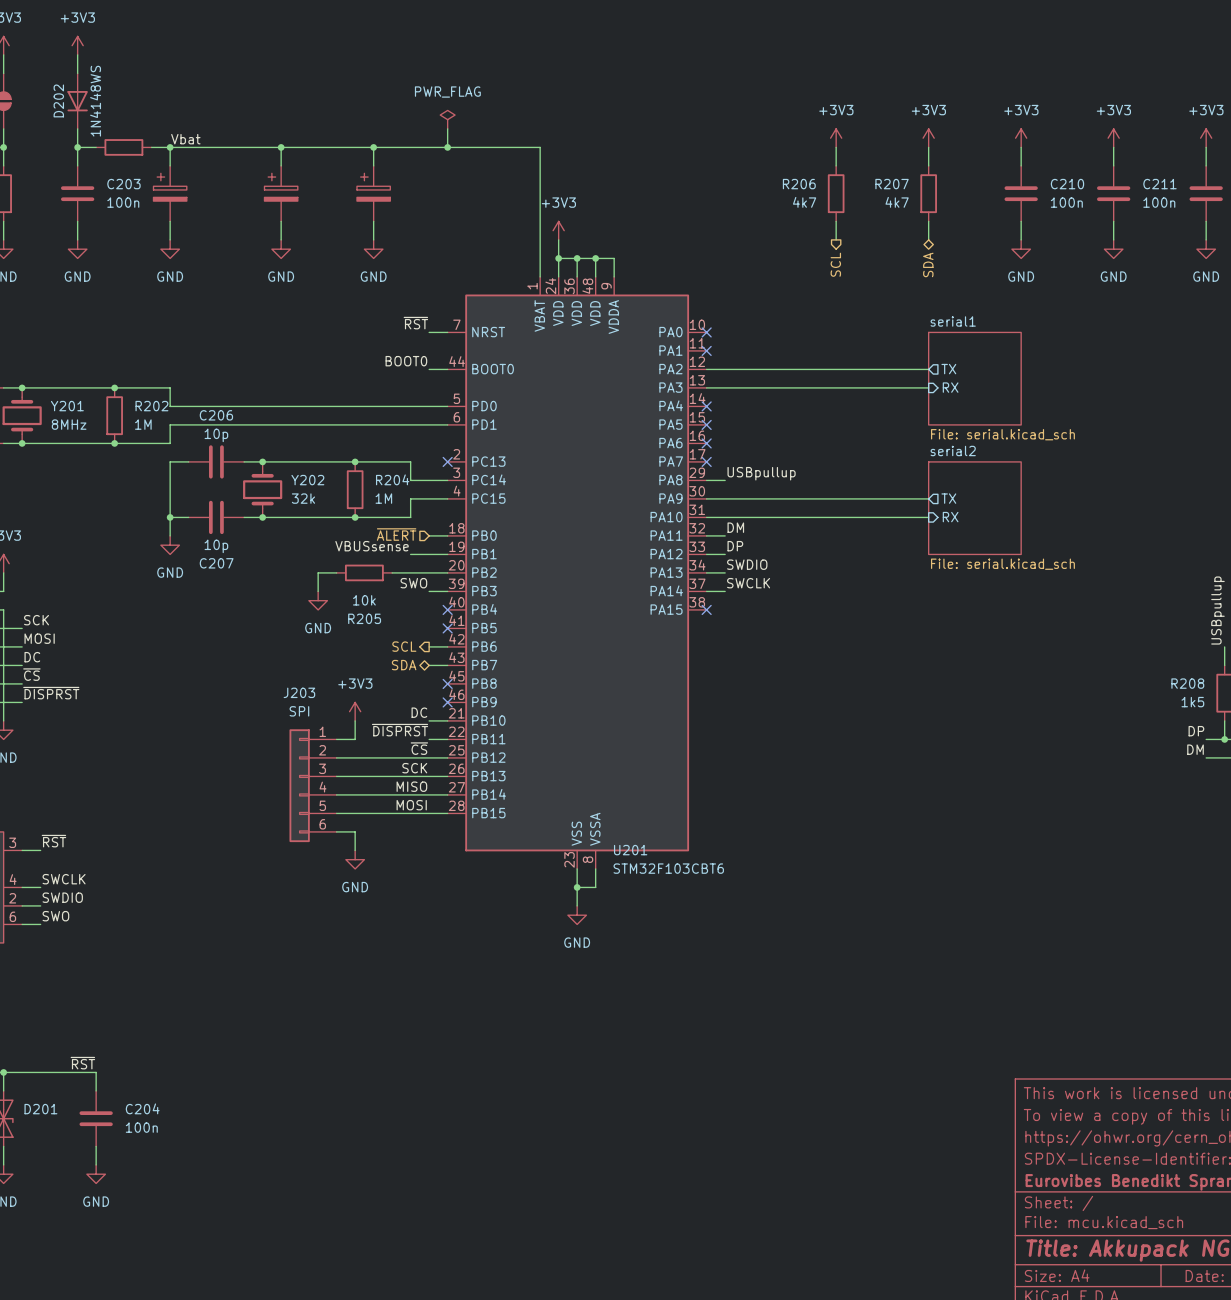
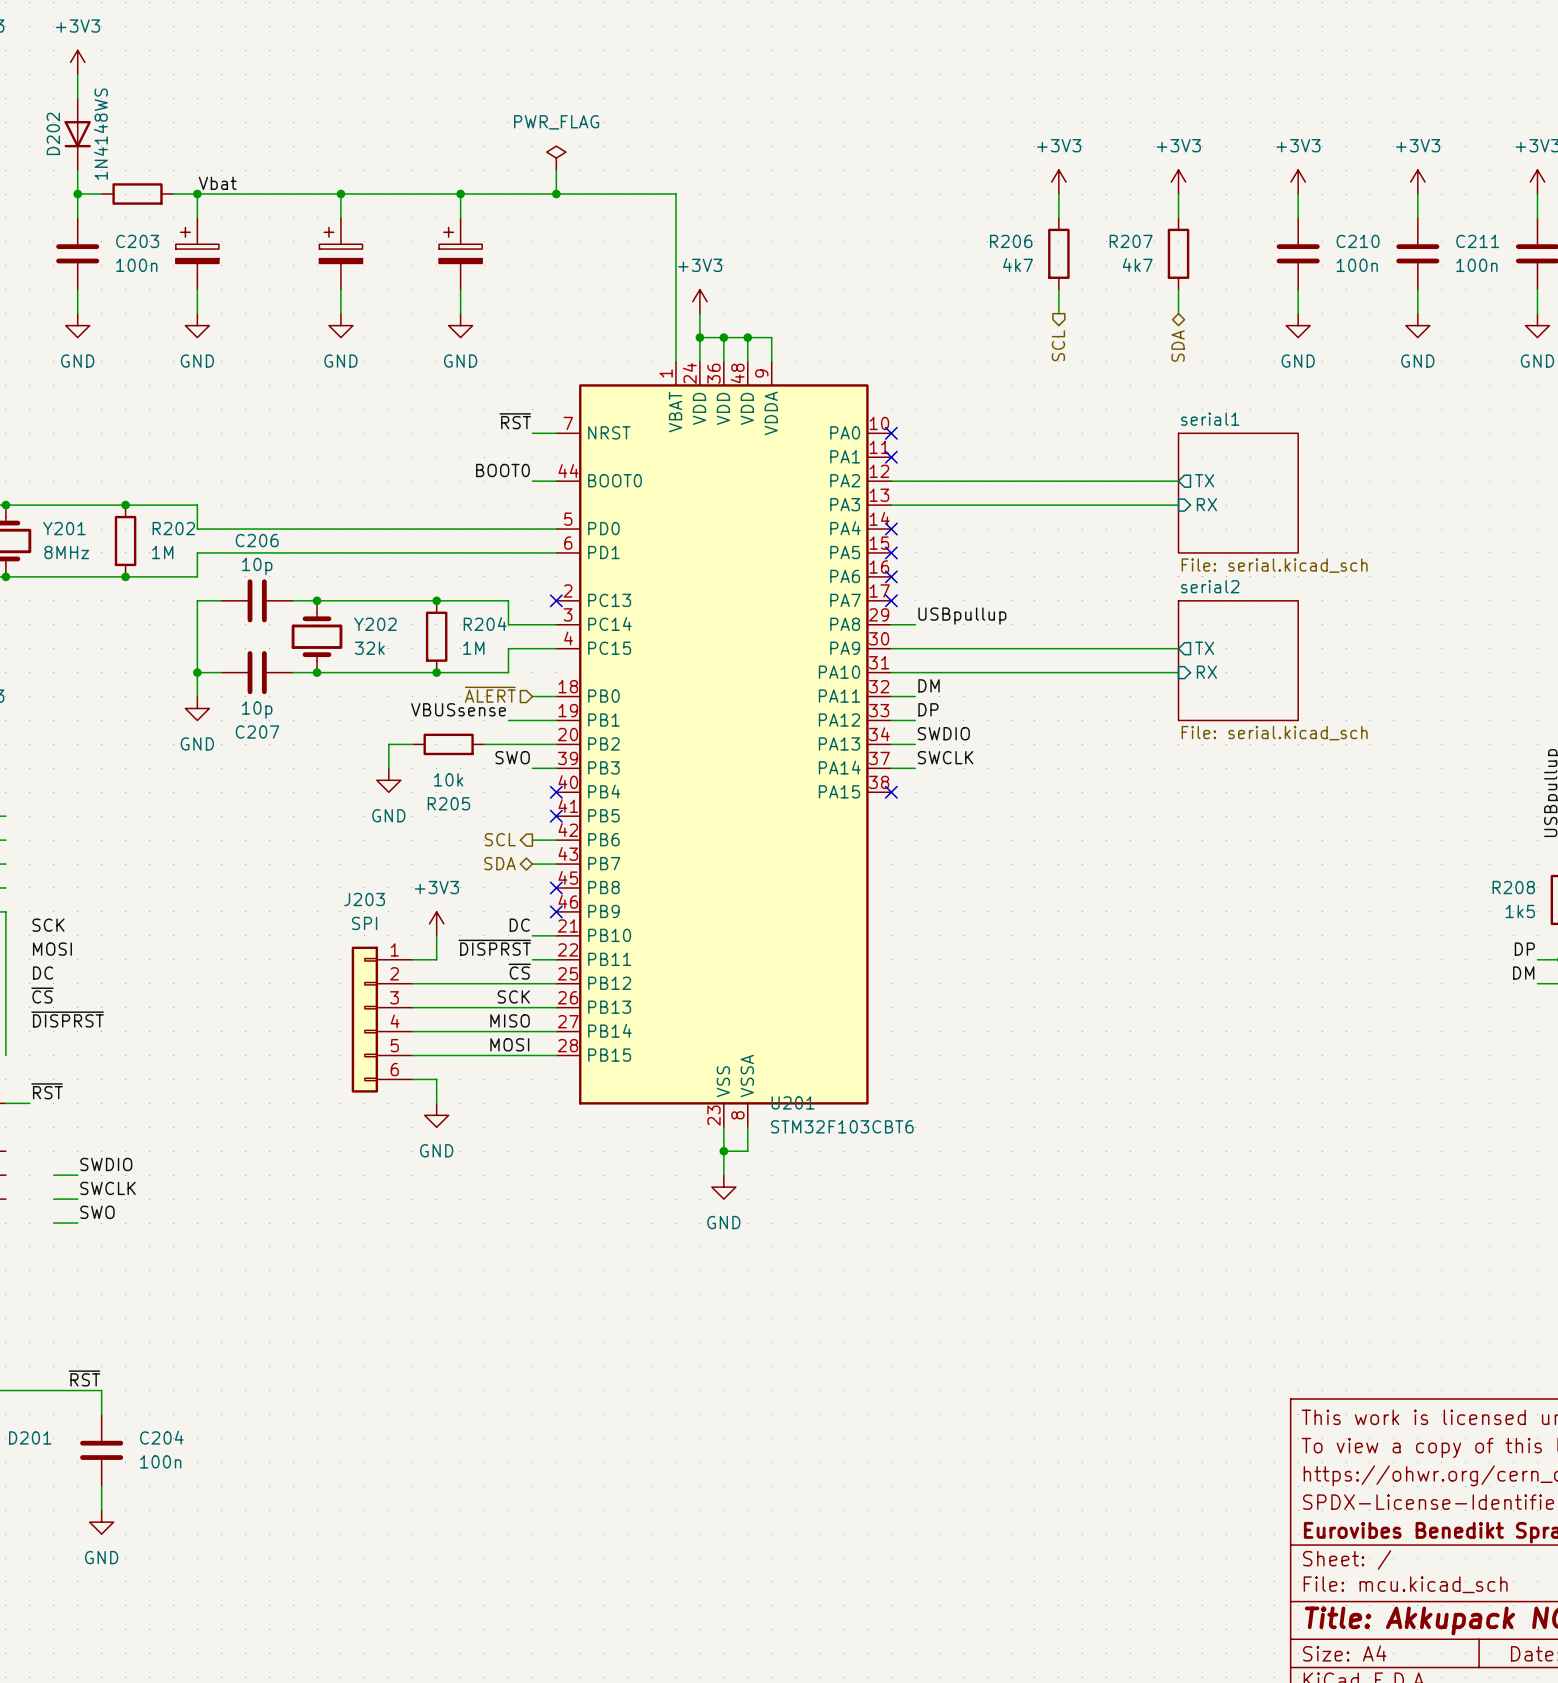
label position: SCK (36, 620) -> SCK (48, 925)
label position: MOSI (39, 638) -> MOSI (52, 949)
label position: DC (32, 657) -> DC (43, 973)
label position: ~{CS} (31, 674) -> ~{CS} (42, 995)
label position: ~{DISPRST} (51, 693) -> ~{DISPRST} (67, 1019)
wire: none -> (5, 911) (5, 1055)
label position: SWCLK (64, 879) -> SWCLK (108, 1188)
wire: (22, 887) (40, 887) -> (53, 1175) (77, 1175)
label position: SWDIO (62, 897) -> SWDIO (106, 1164)
wire: (22, 905) (40, 905) -> (53, 1199) (77, 1199)
label position: SWO (55, 916) -> SWO (97, 1212)
wire: (22, 924) (40, 924) -> (53, 1223) (77, 1223)

